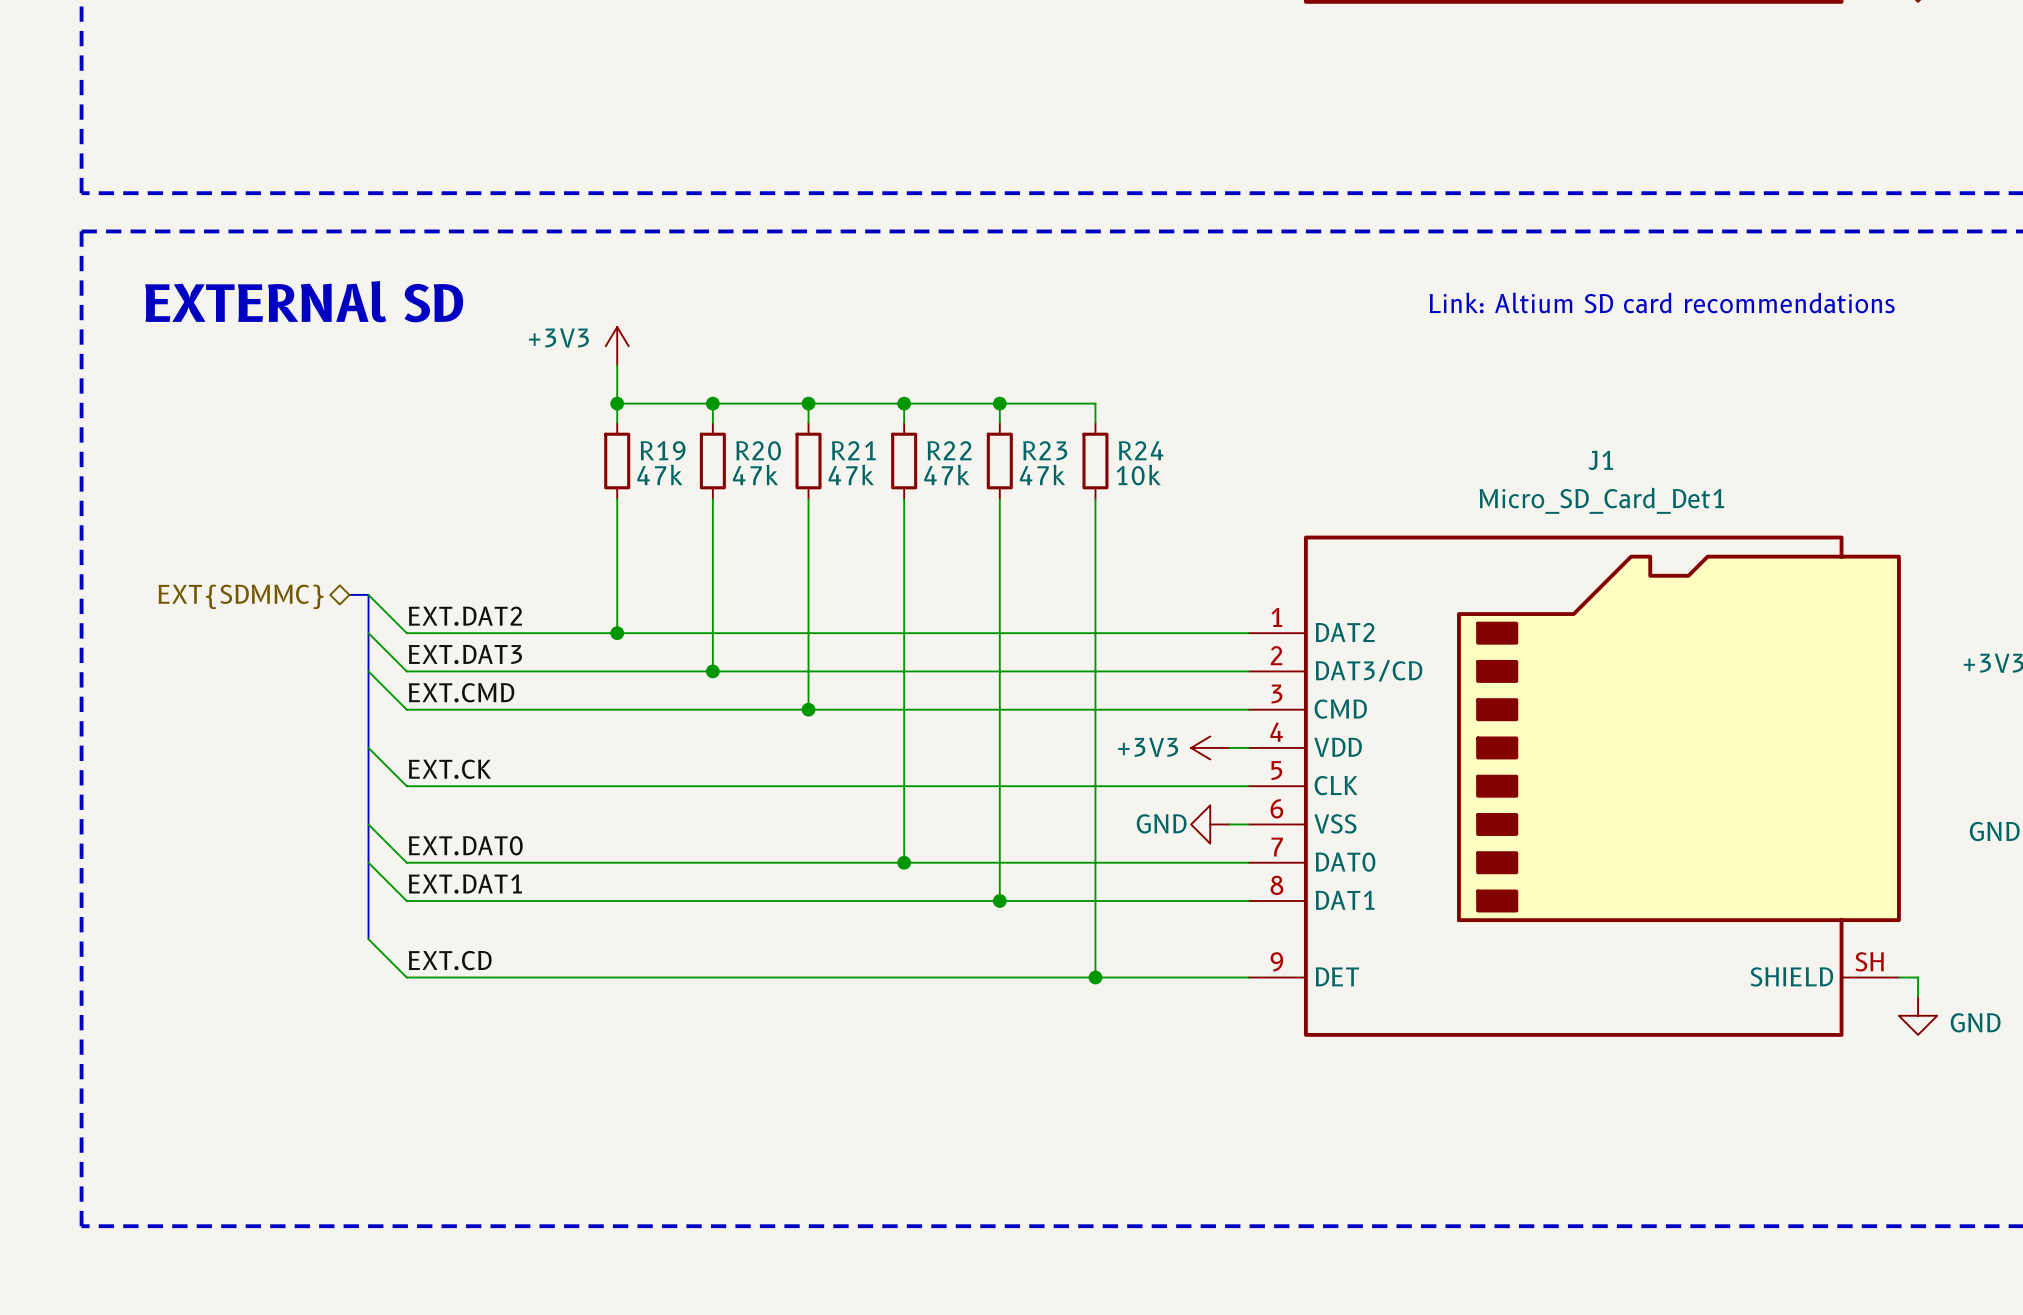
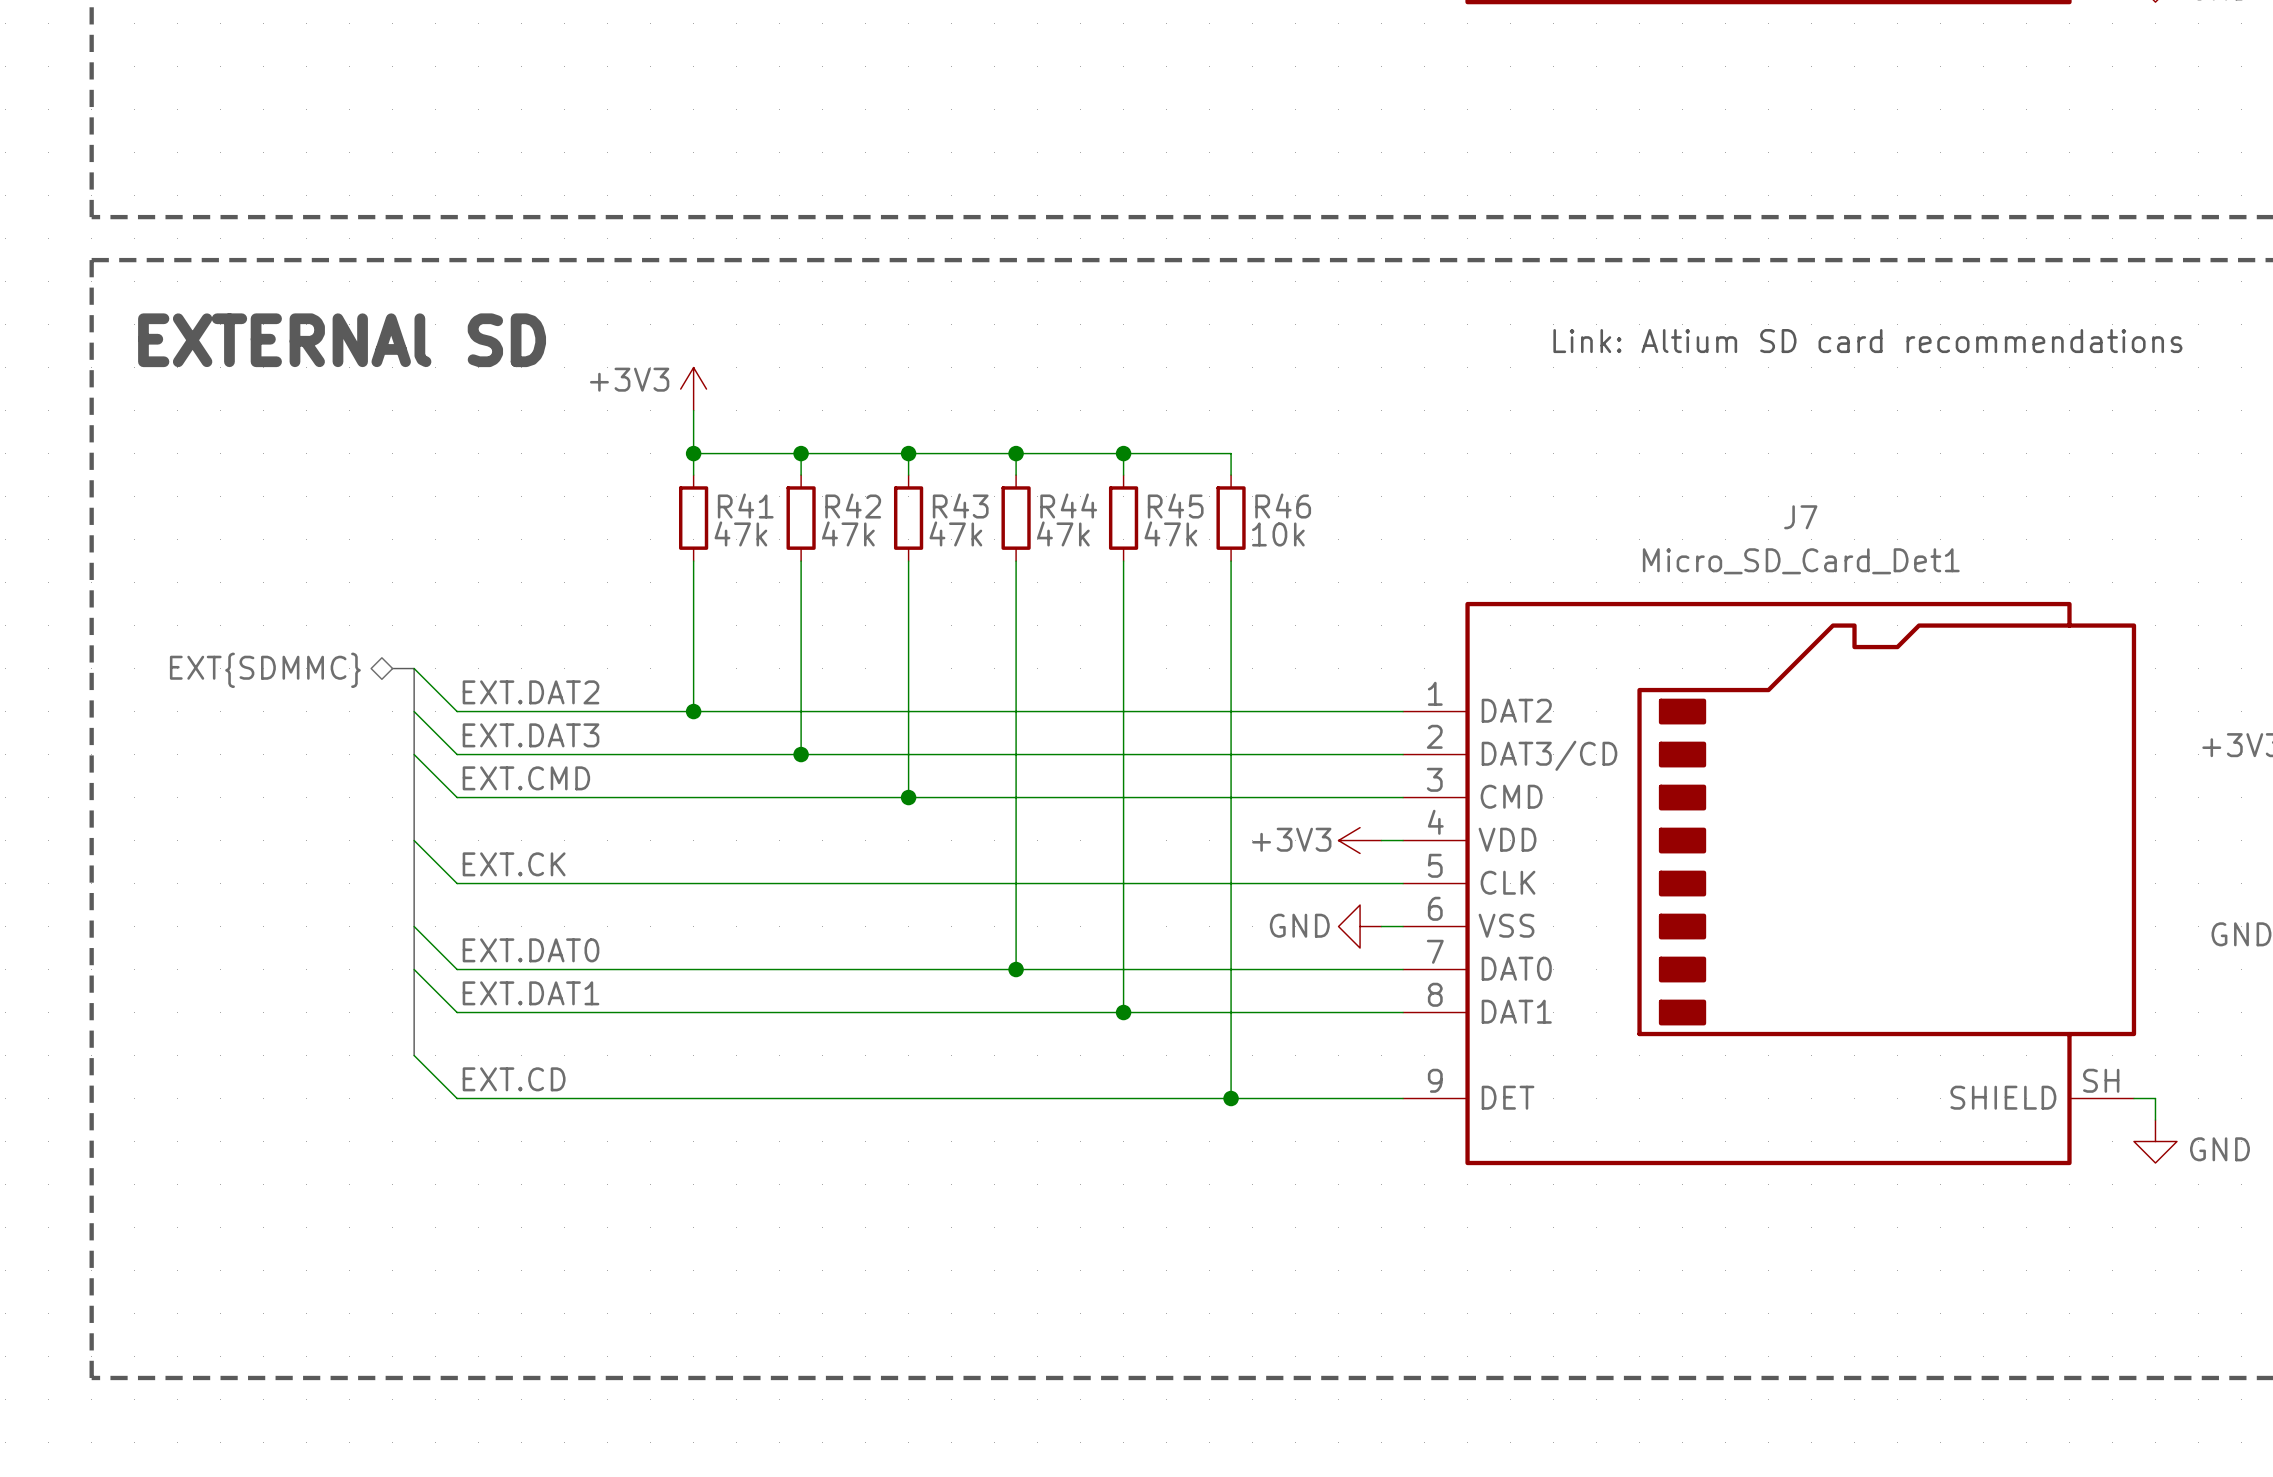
R19 name: R19 (662, 450) -> R41 (745, 506)
R20 name: R20 (758, 450) -> R42 (853, 506)
R21 name: R21 (853, 450) -> R43 (960, 506)
R22 name: R22 (949, 450) -> R44 (1068, 506)
R23 name: R23 (1045, 450) -> R45 (1175, 506)
R24 name: R24 (1141, 450) -> R46 (1283, 506)
J1 name: J1 (1600, 460) -> J7 (1800, 517)

